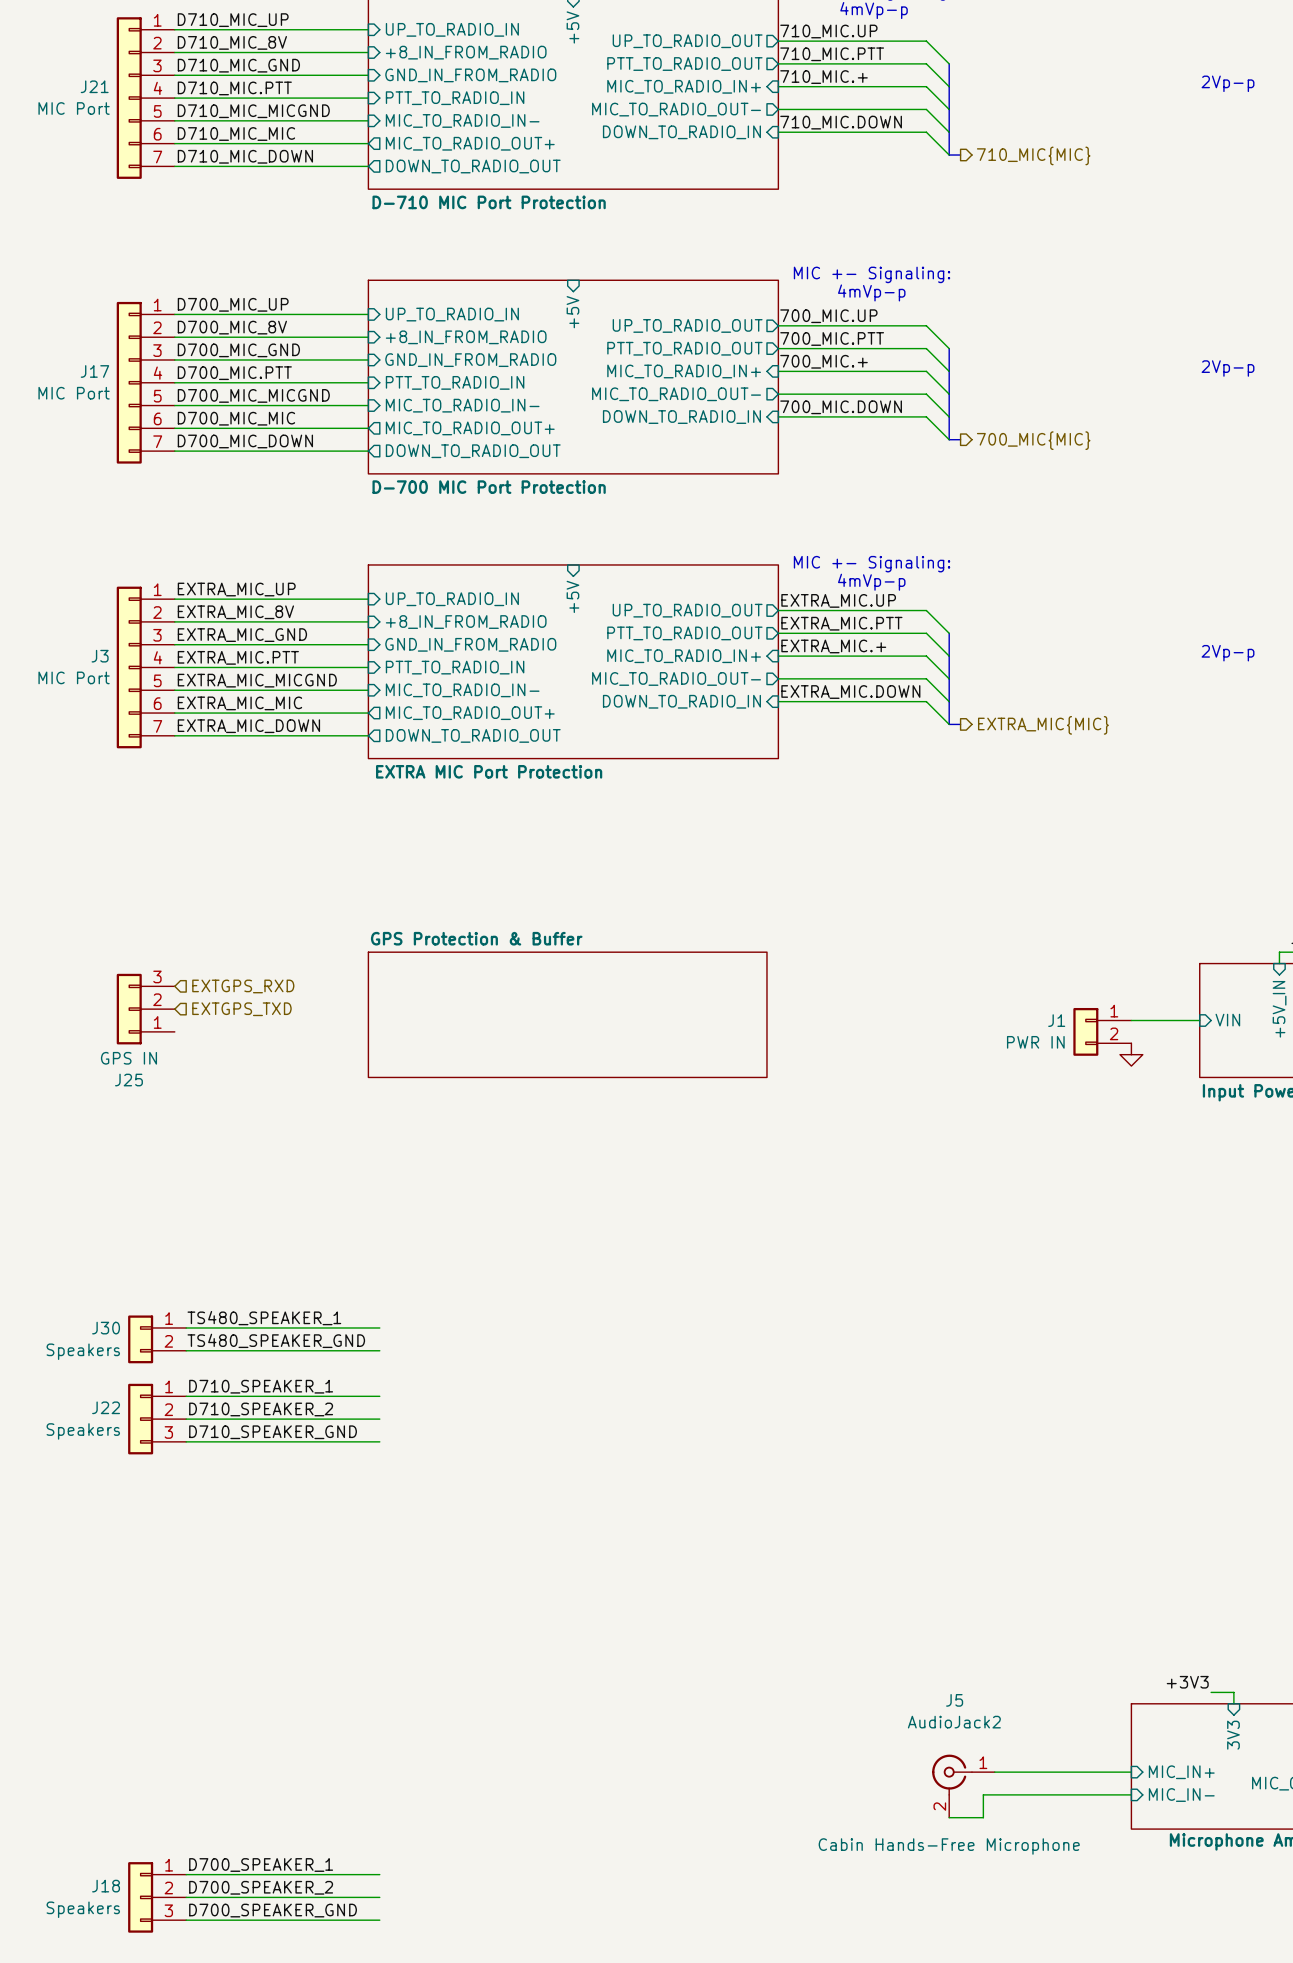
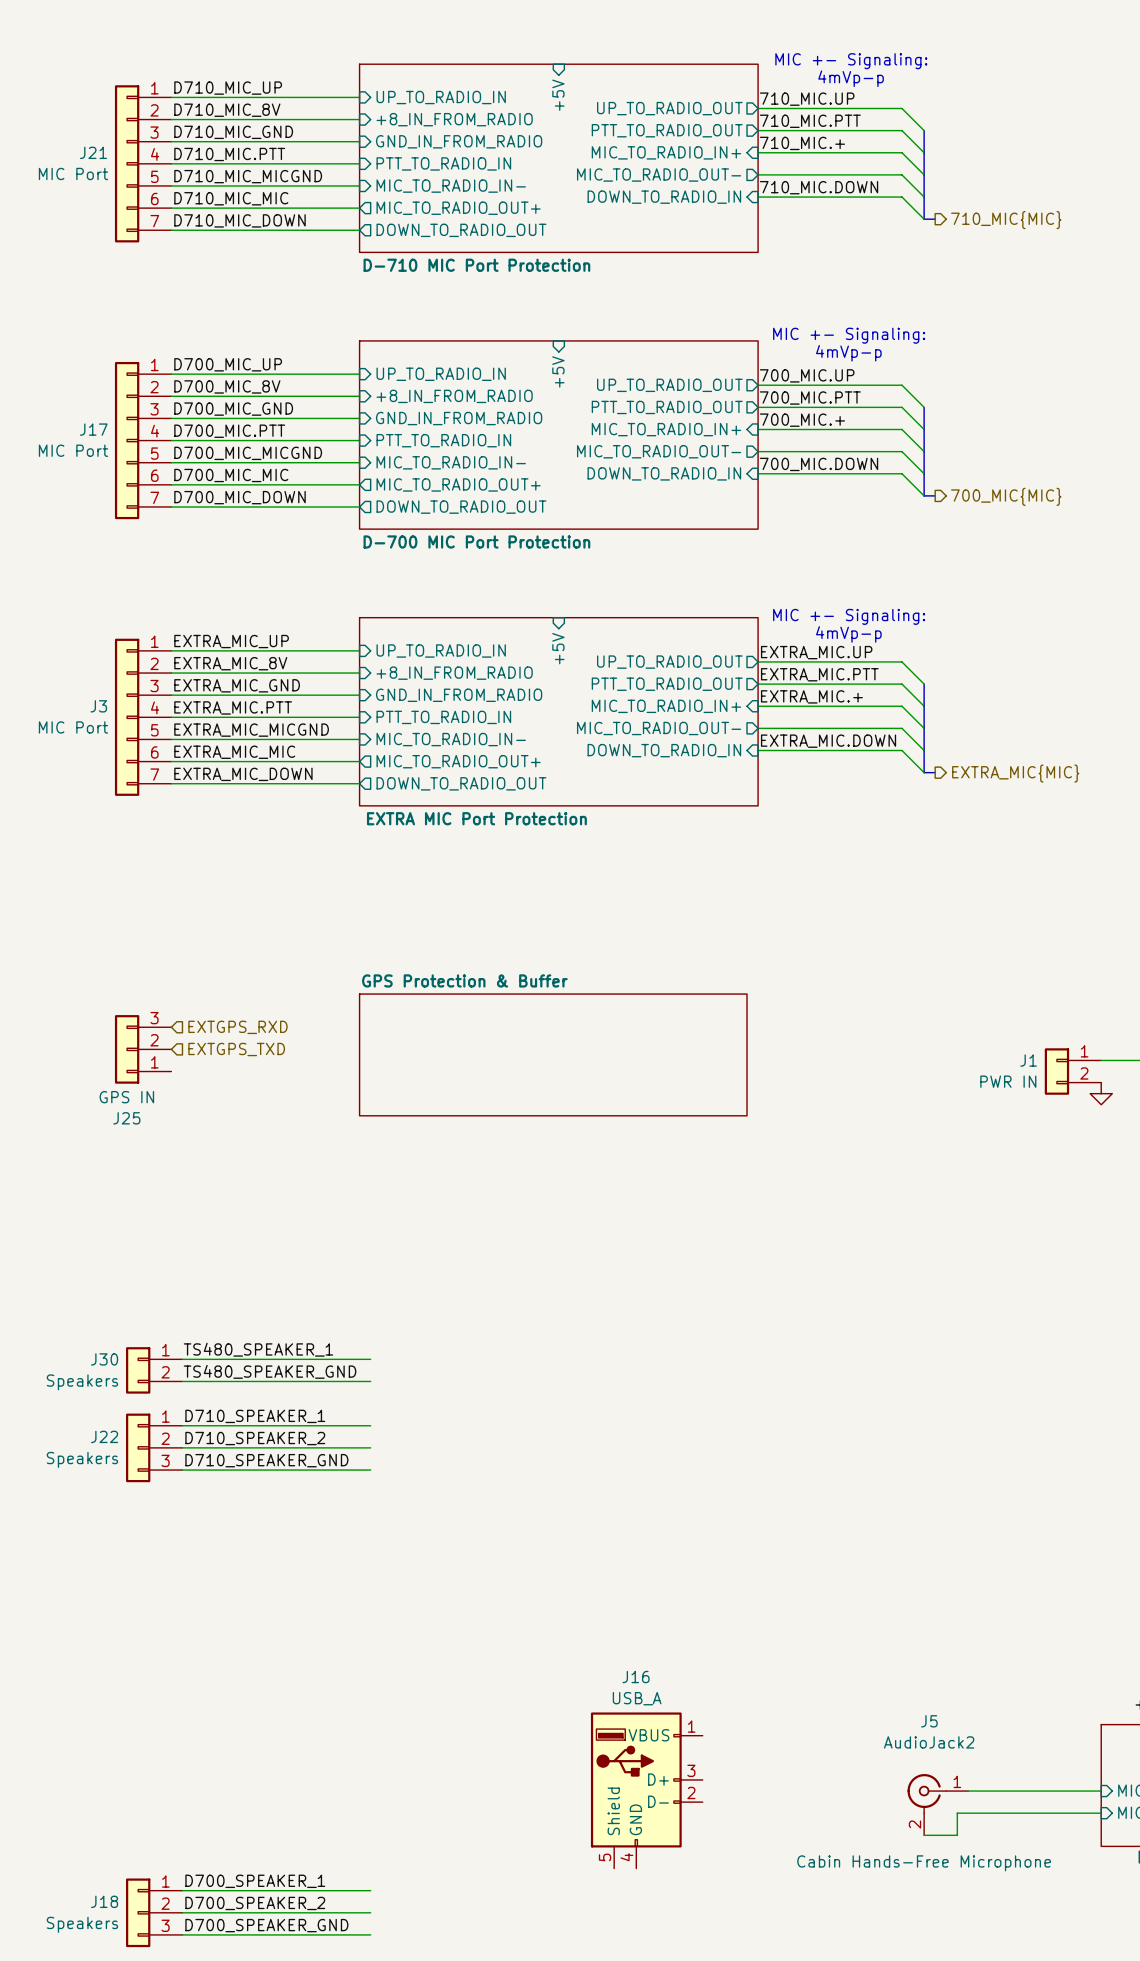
J16: none -> USB_A (646, 1790)

